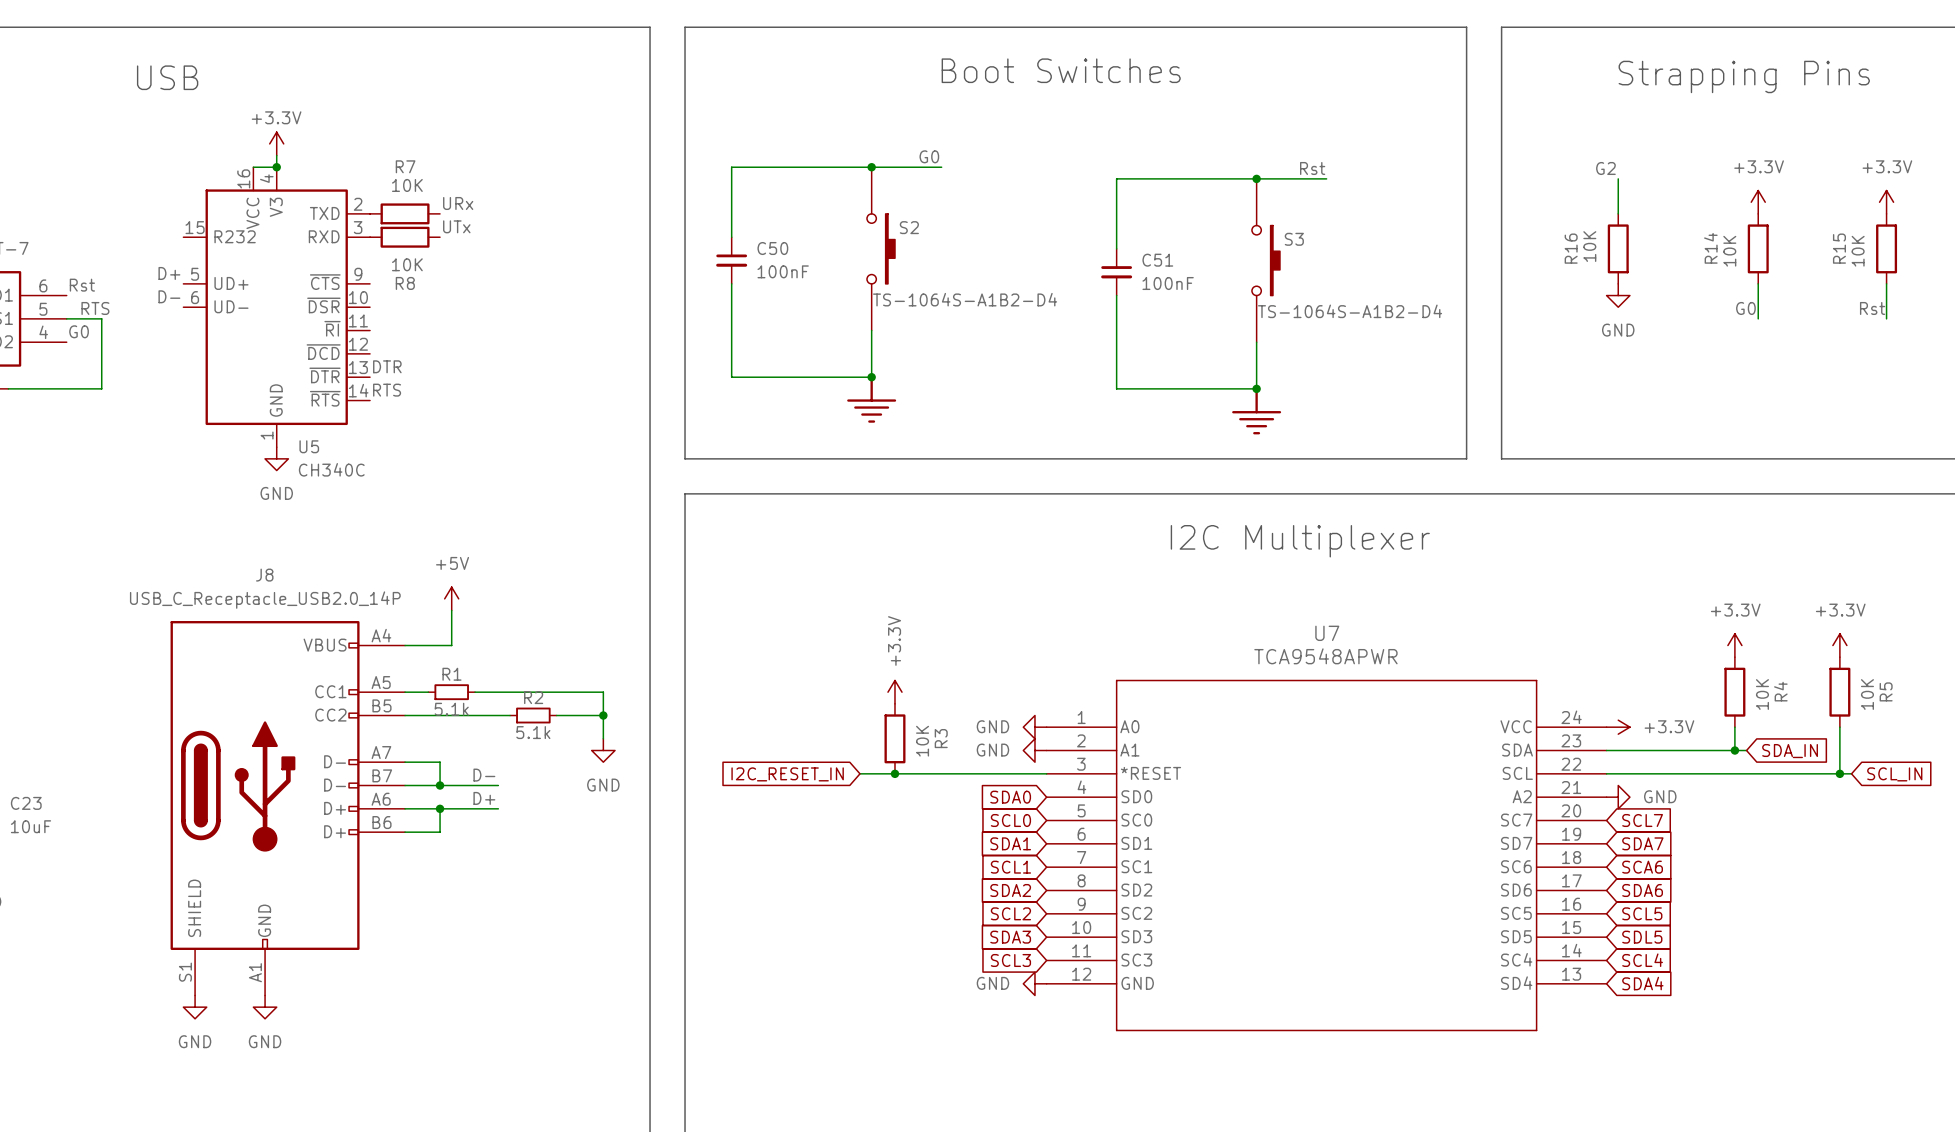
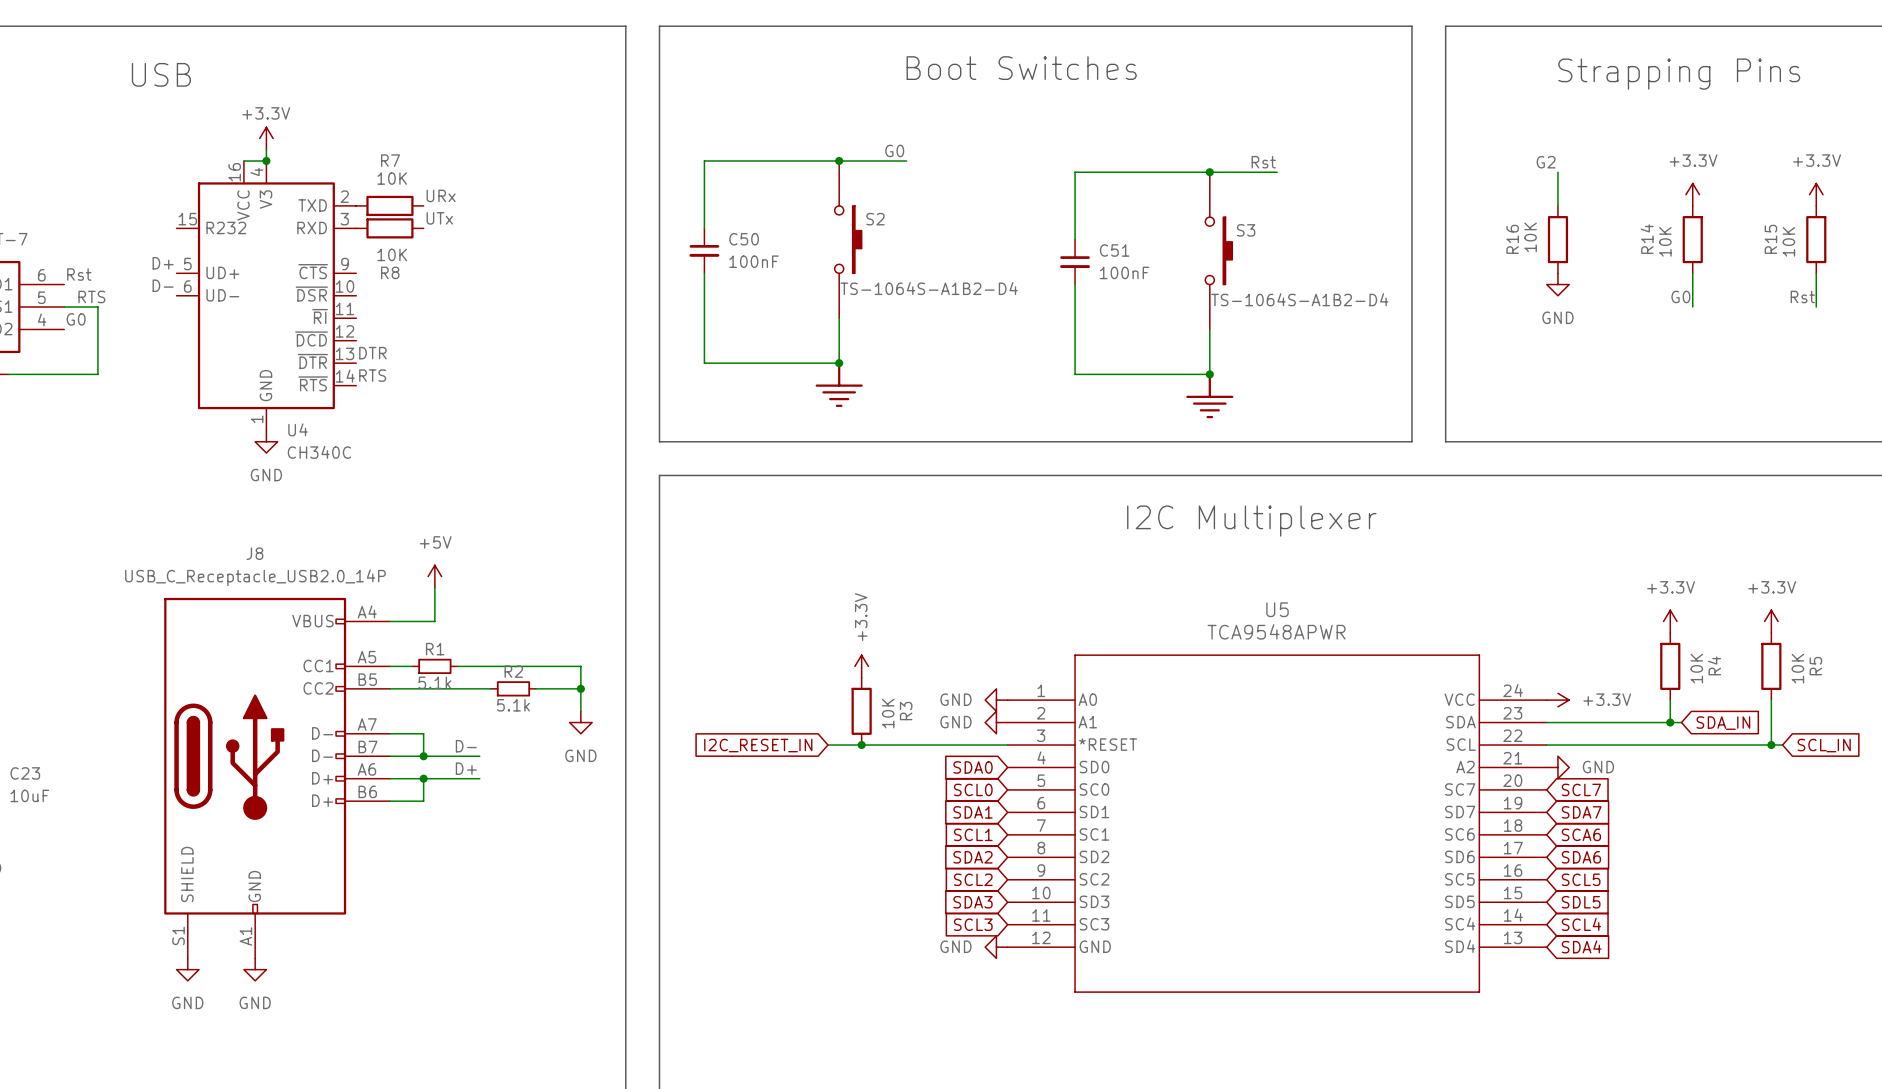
U5 name: U5 (309, 446) -> U4 (298, 429)
U7 name: U7 (1327, 633) -> U5 (1277, 609)

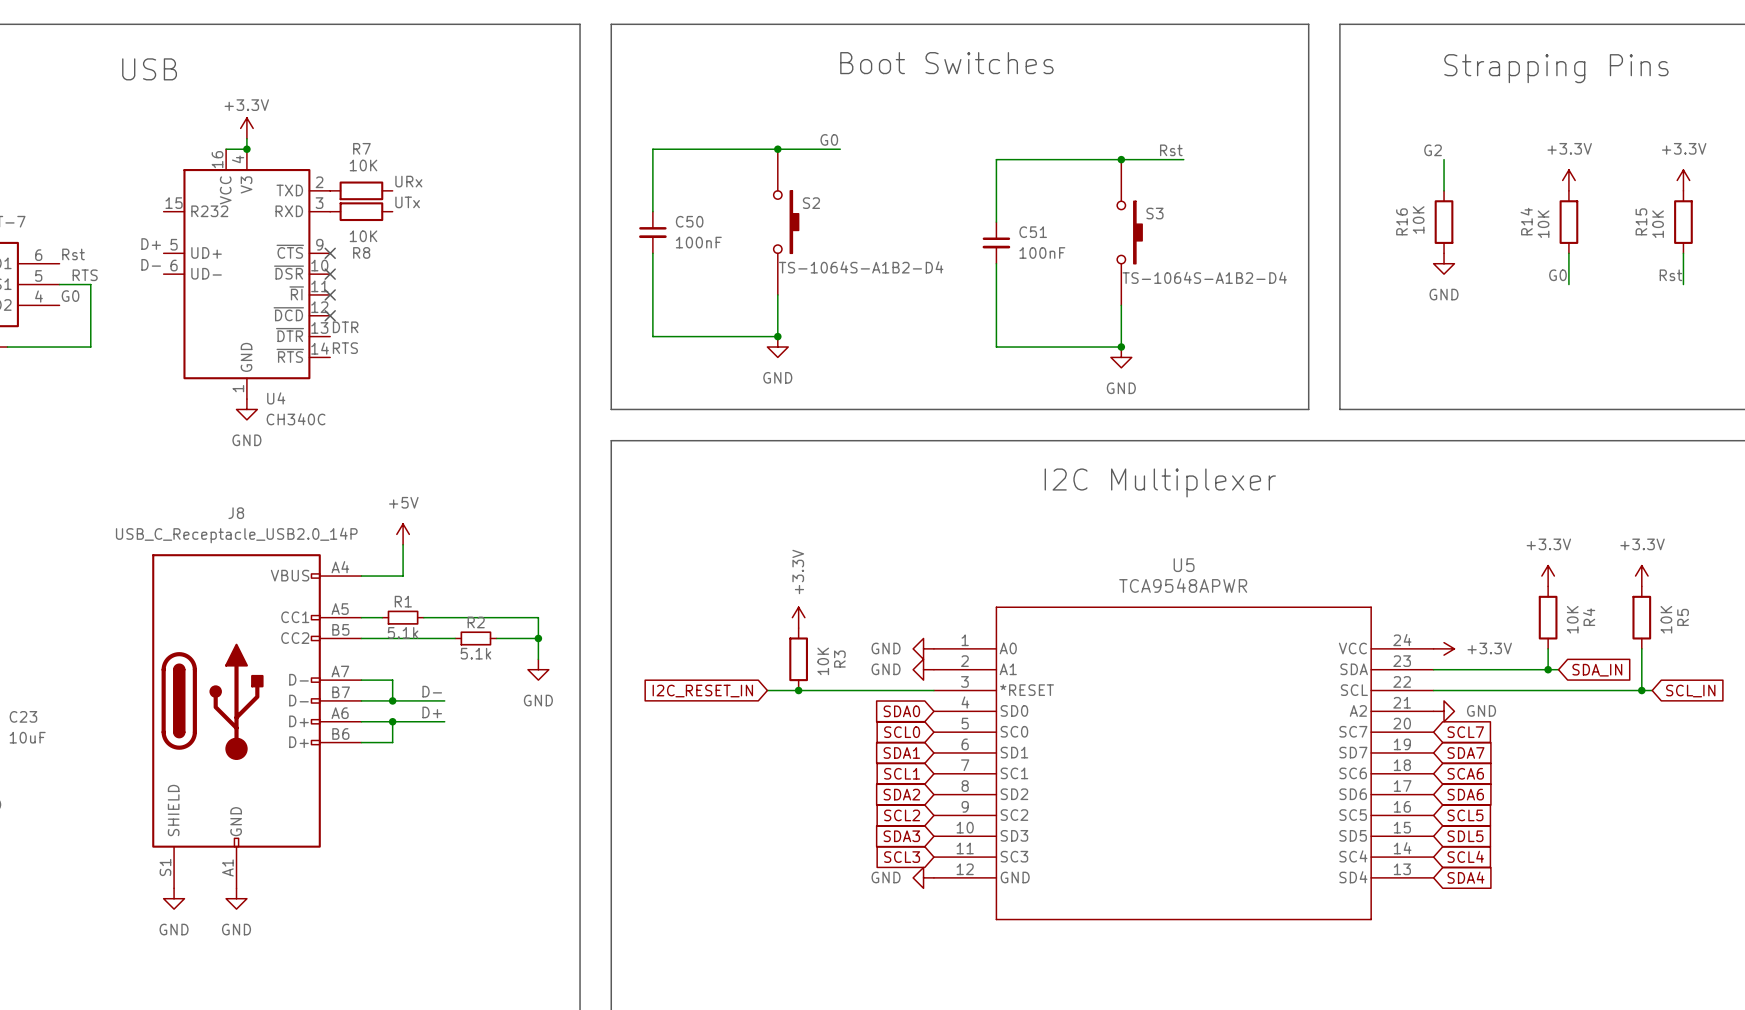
no-connect mark: none -> (330, 253)
no-connect mark: none -> (330, 274)
no-connect mark: none -> (330, 294)
no-connect mark: none -> (330, 315)
power symbol: none -> GND (777, 347)
power symbol: (839, 384) -> none
power symbol: none -> GND (1121, 357)
power symbol: (1209, 395) -> none

